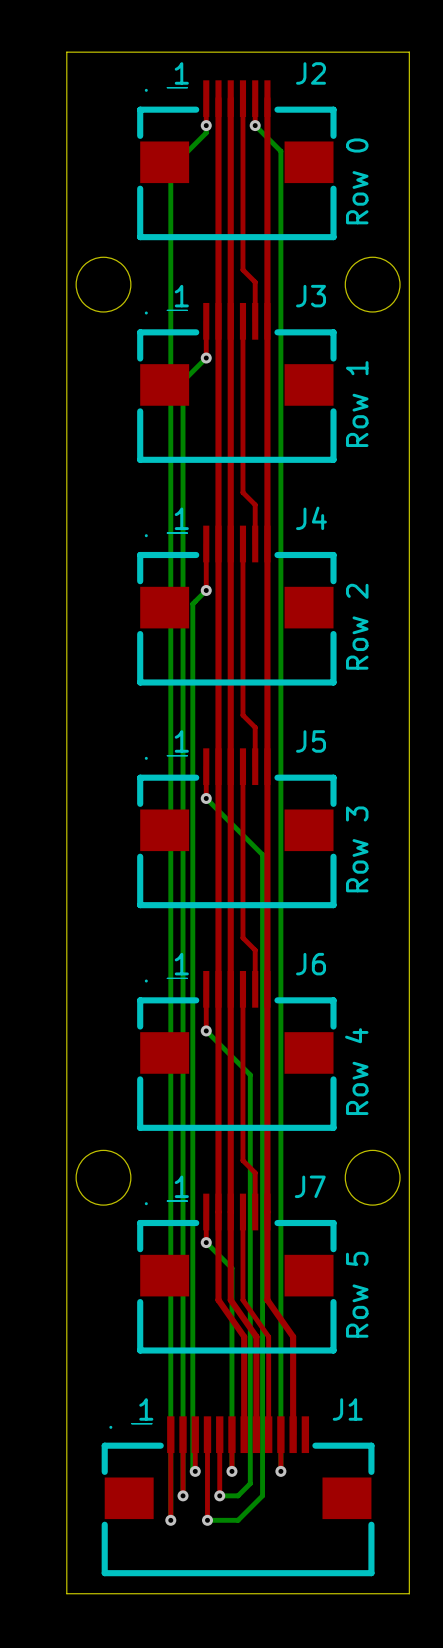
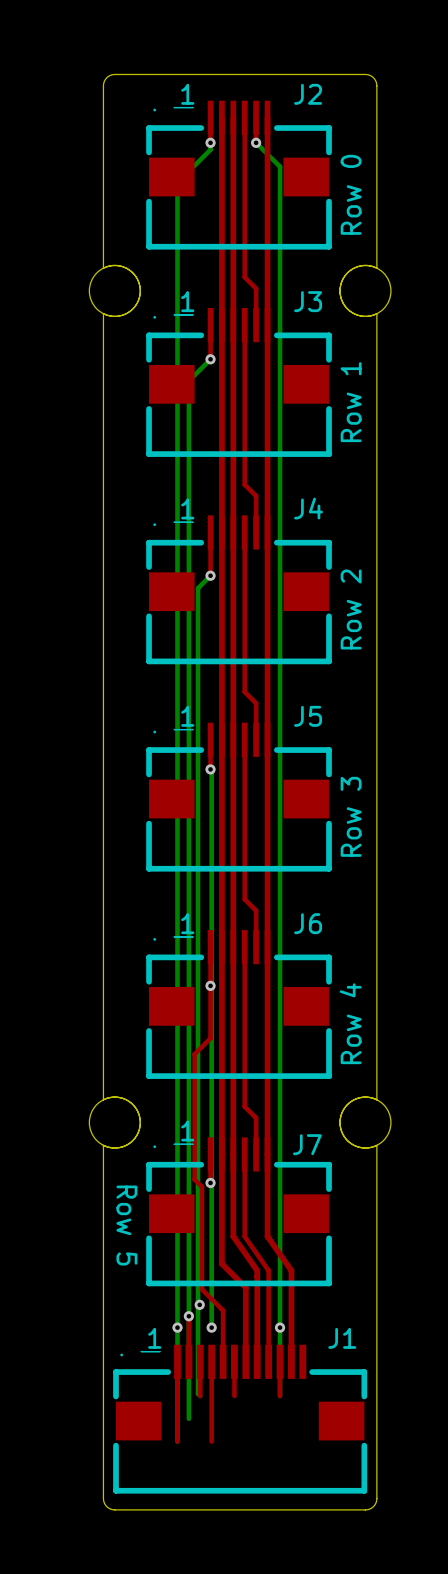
board edge: (103, 52) (66, 52) (66, 1593) (103, 1593) -> (114, 74) (106, 77) (103, 85) (103, 268) (115, 265) (128, 269) (137, 278) (140, 290) (137, 303) (128, 312) (115, 316) (103, 313) (103, 1099) (115, 1097) (128, 1100) (137, 1110) (140, 1122) (137, 1134) (128, 1144) (115, 1148) (103, 1145) (103, 1498) (106, 1506) (114, 1509)
board edge: (372, 52) (409, 52) (409, 1593) (372, 1593) -> (365, 74) (373, 77) (376, 85) (376, 268) (364, 265) (352, 269) (343, 278) (340, 290) (343, 303) (352, 312) (364, 316) (376, 313) (376, 1099) (364, 1097) (352, 1100) (343, 1110) (340, 1122) (343, 1134) (352, 1144) (364, 1148) (376, 1145) (376, 1498) (373, 1506) (365, 1509)
bottom track: (207, 799) (262, 854) (262, 1495) (238, 1520) (207, 1520) -> (211, 770) (211, 1327)
bottom track: (206, 1030) (250, 1074) (250, 1483) (238, 1495) (219, 1495) -> none
J7 name position: J7 (310, 1186) -> J7 (307, 1144)
bottom track: (206, 1242) (231, 1268) (231, 1471) -> none
text rotation: 0° (357, 1294) -> 180° (126, 1225)
text position: Row 5 (357, 1294) -> Row 5 (126, 1225)
top track: (218, 1300) (244, 1336) (244, 1355) -> (221, 1236) (221, 1263) (245, 1287)
via: none -> (199, 1304)
via: none -> (188, 1316)
via: none -> (177, 1327)
via: none -> (211, 1327)
via: none -> (280, 1327)
top track: (183, 1434) (183, 1495) -> (188, 1361) (188, 1316)
top track: (219, 1434) (219, 1495) -> (223, 1361) (223, 1310) (201, 1289) (201, 1186) (194, 1179) (194, 1054) (210, 1038) (210, 985)
via: (195, 1471) -> none
via: (231, 1471) -> none
via: (280, 1471) -> none
via: (183, 1495) -> none
via: (219, 1495) -> none
via: (170, 1520) -> none
via: (207, 1520) -> none

